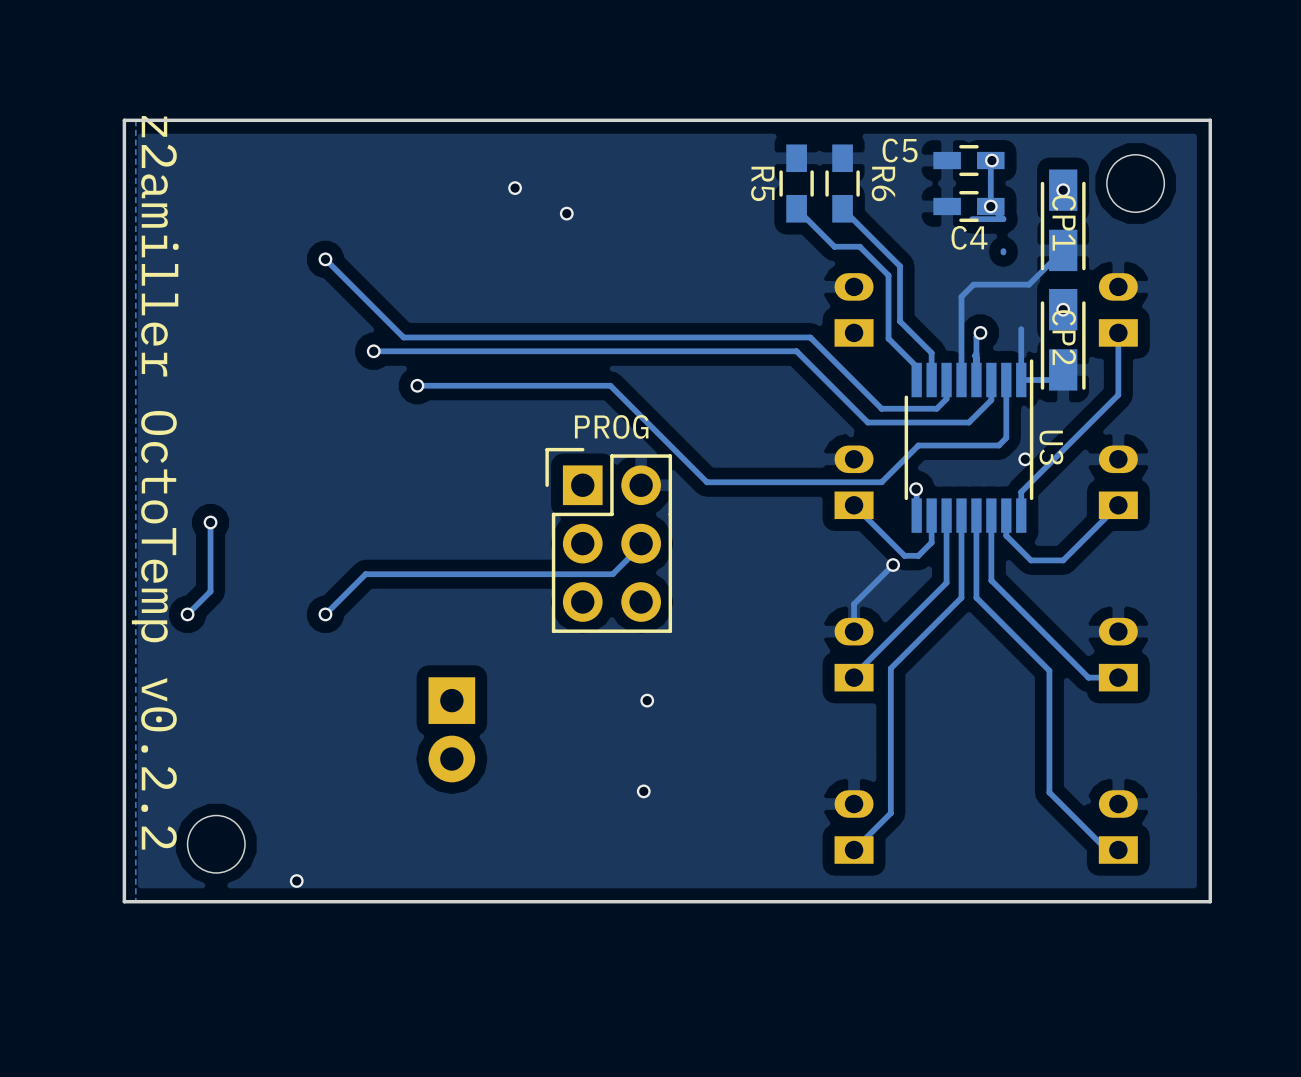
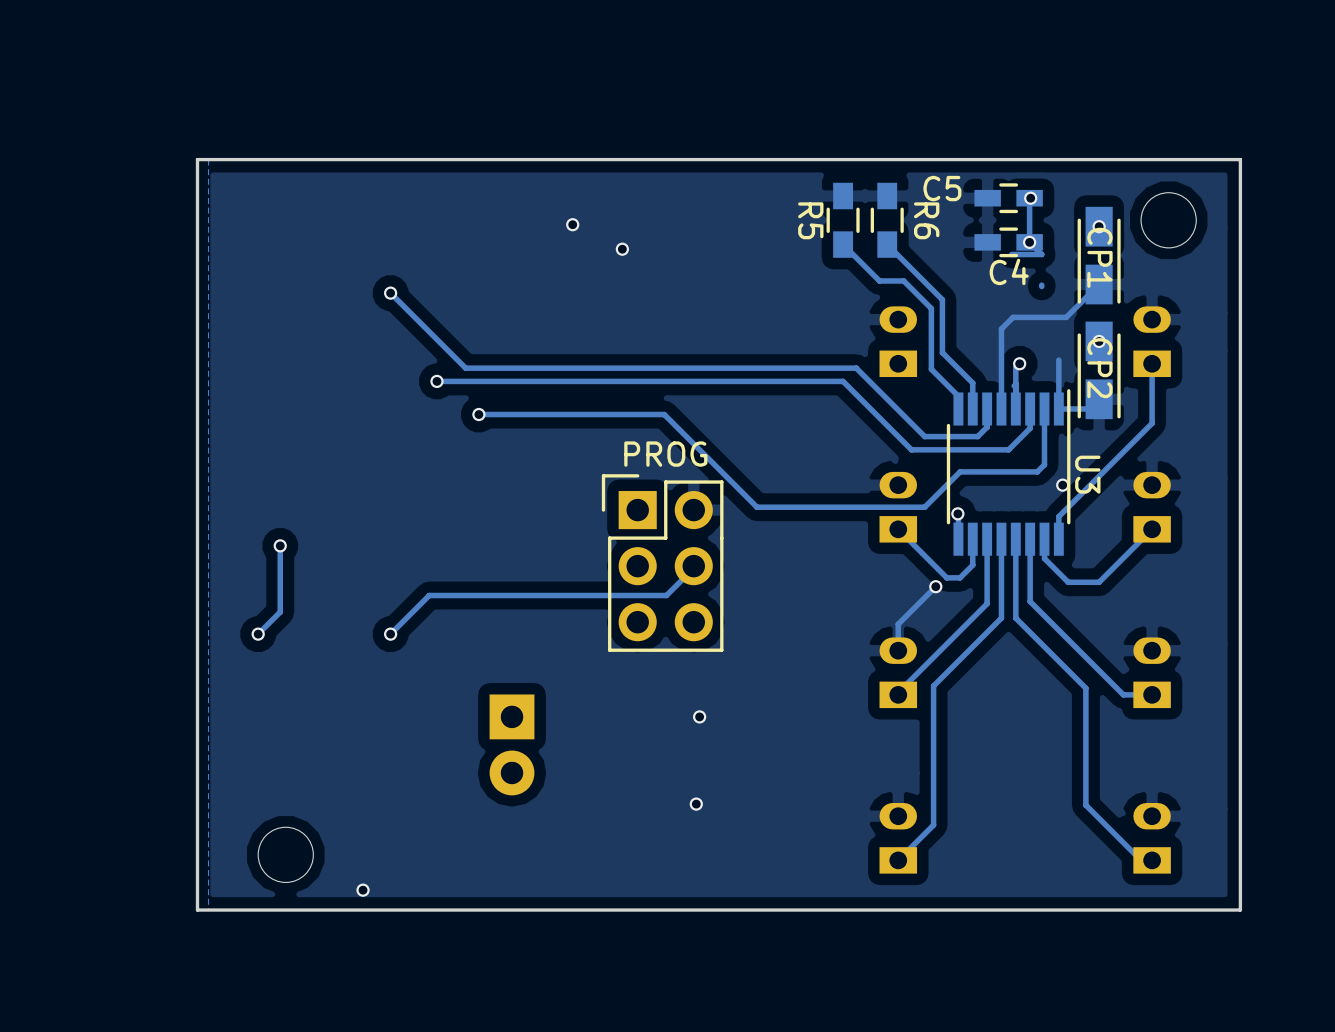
text: z2amiller OctoTemp v0.2.2 (155, 482) -> none

